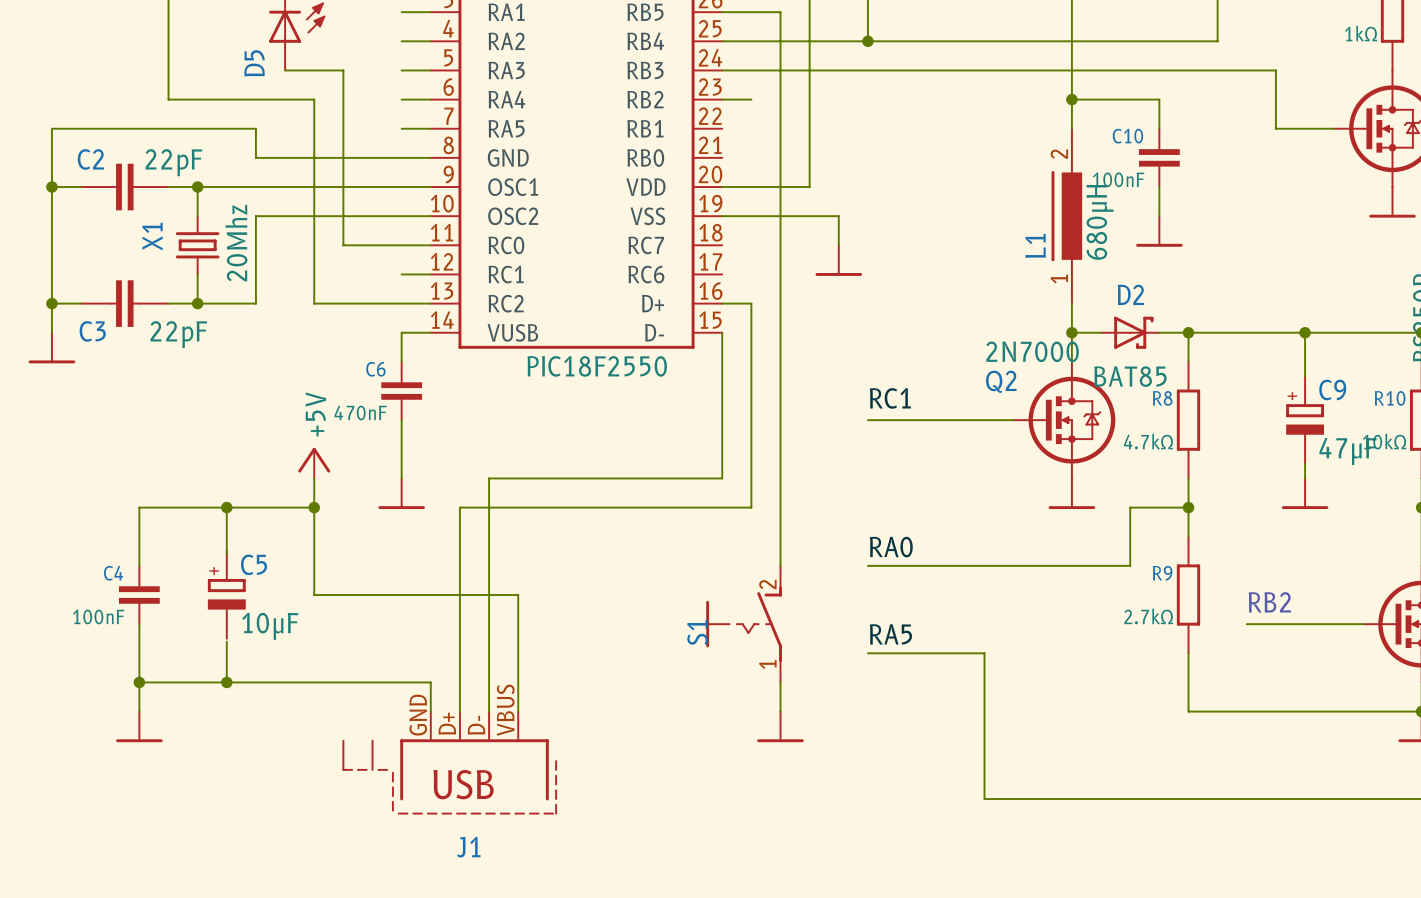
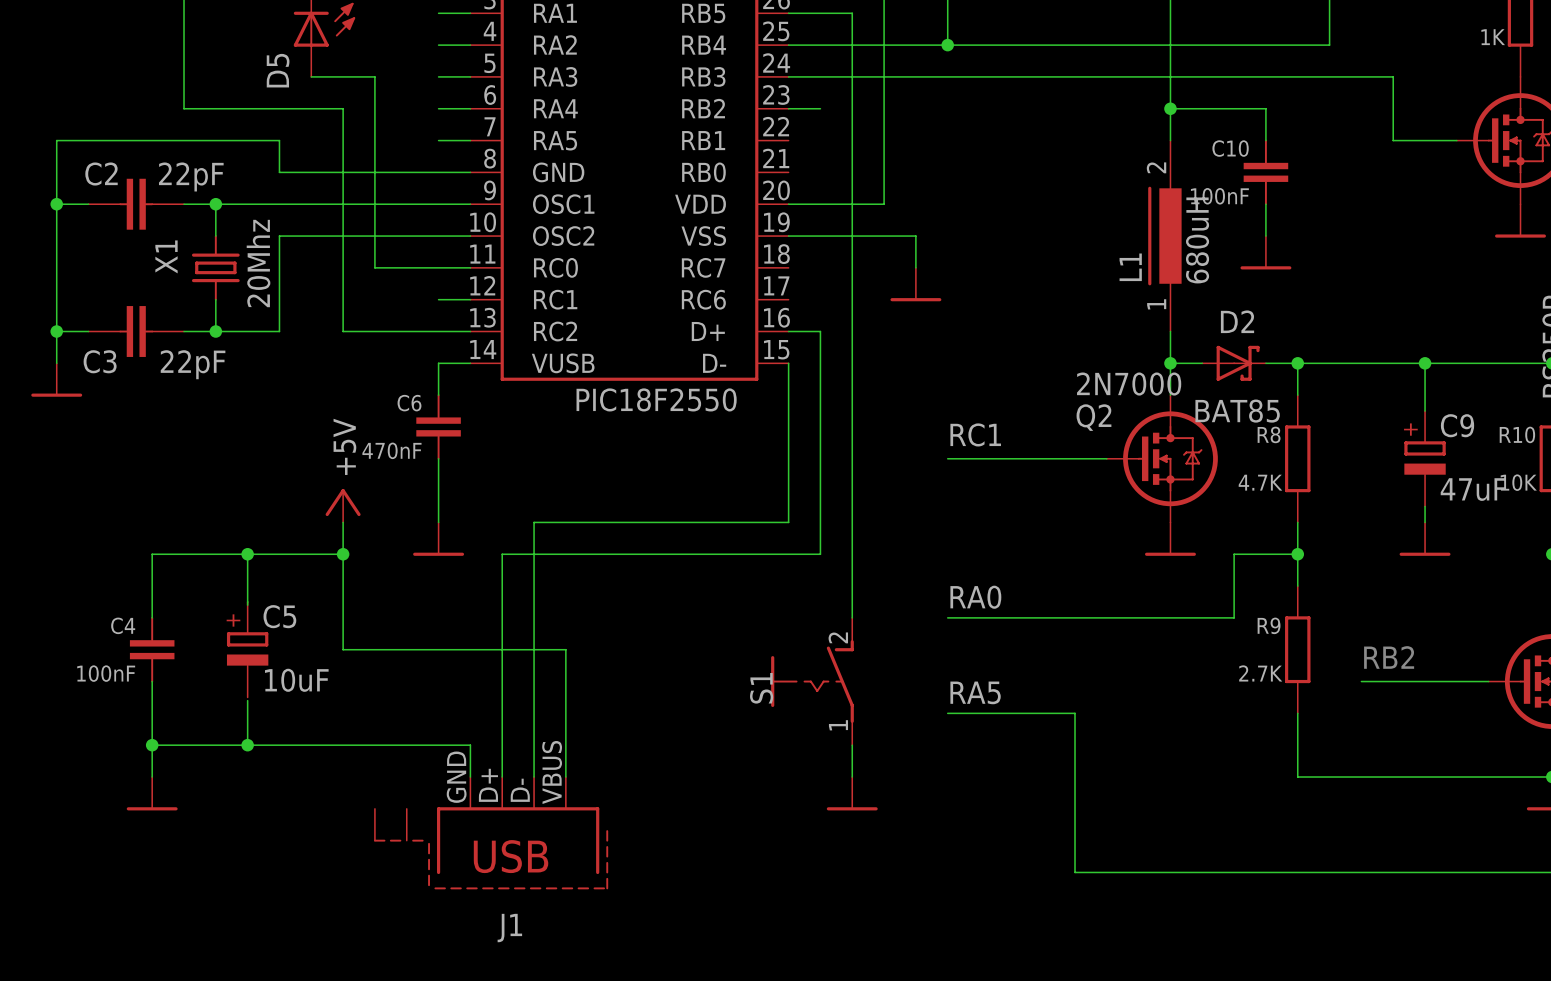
part value: 1kΩ (1361, 33) -> 1K (1493, 37)
L1 value: 680μH (1100, 222) -> 680uH (1197, 240)
R8 value: 4.7kΩ (1148, 441) -> 4.7K (1260, 482)
R10 value: 10kΩ (1384, 441) -> 10K (1518, 482)
C9 value: 47μF (1348, 451) -> 47uF (1473, 489)
R9 value: 2.7kΩ (1148, 616) -> 2.7K (1260, 673)
C5 value: 10μF (270, 626) -> 10uF (296, 680)

